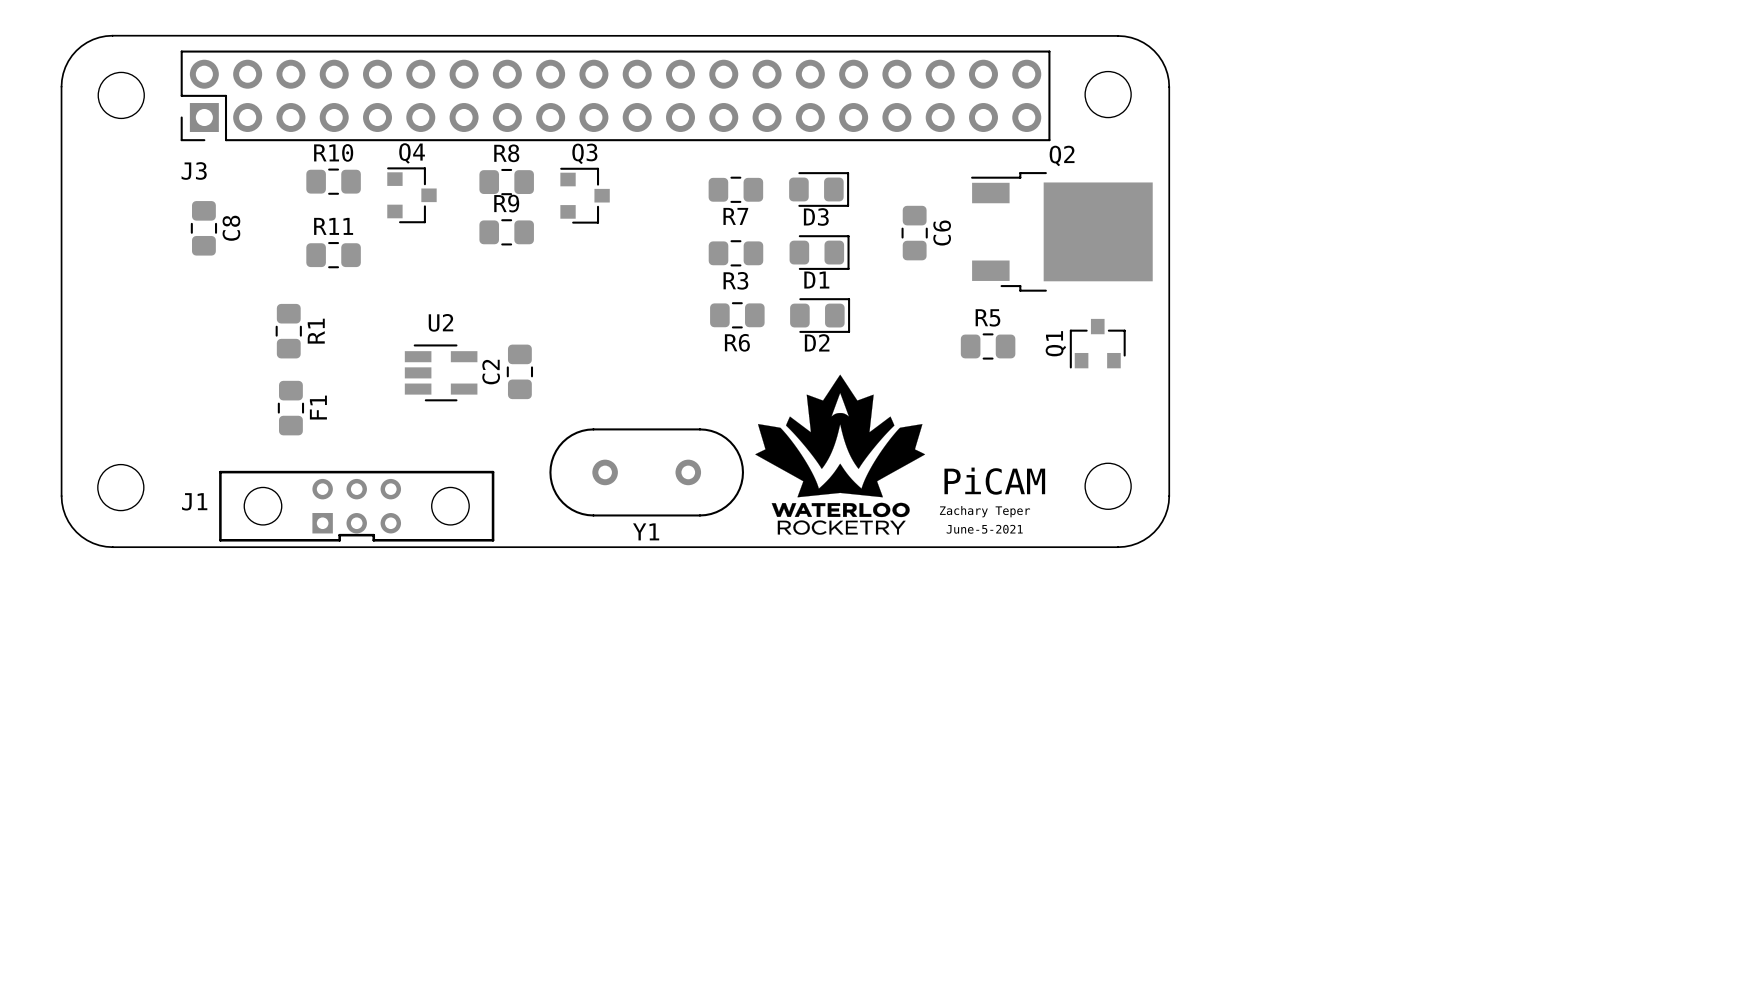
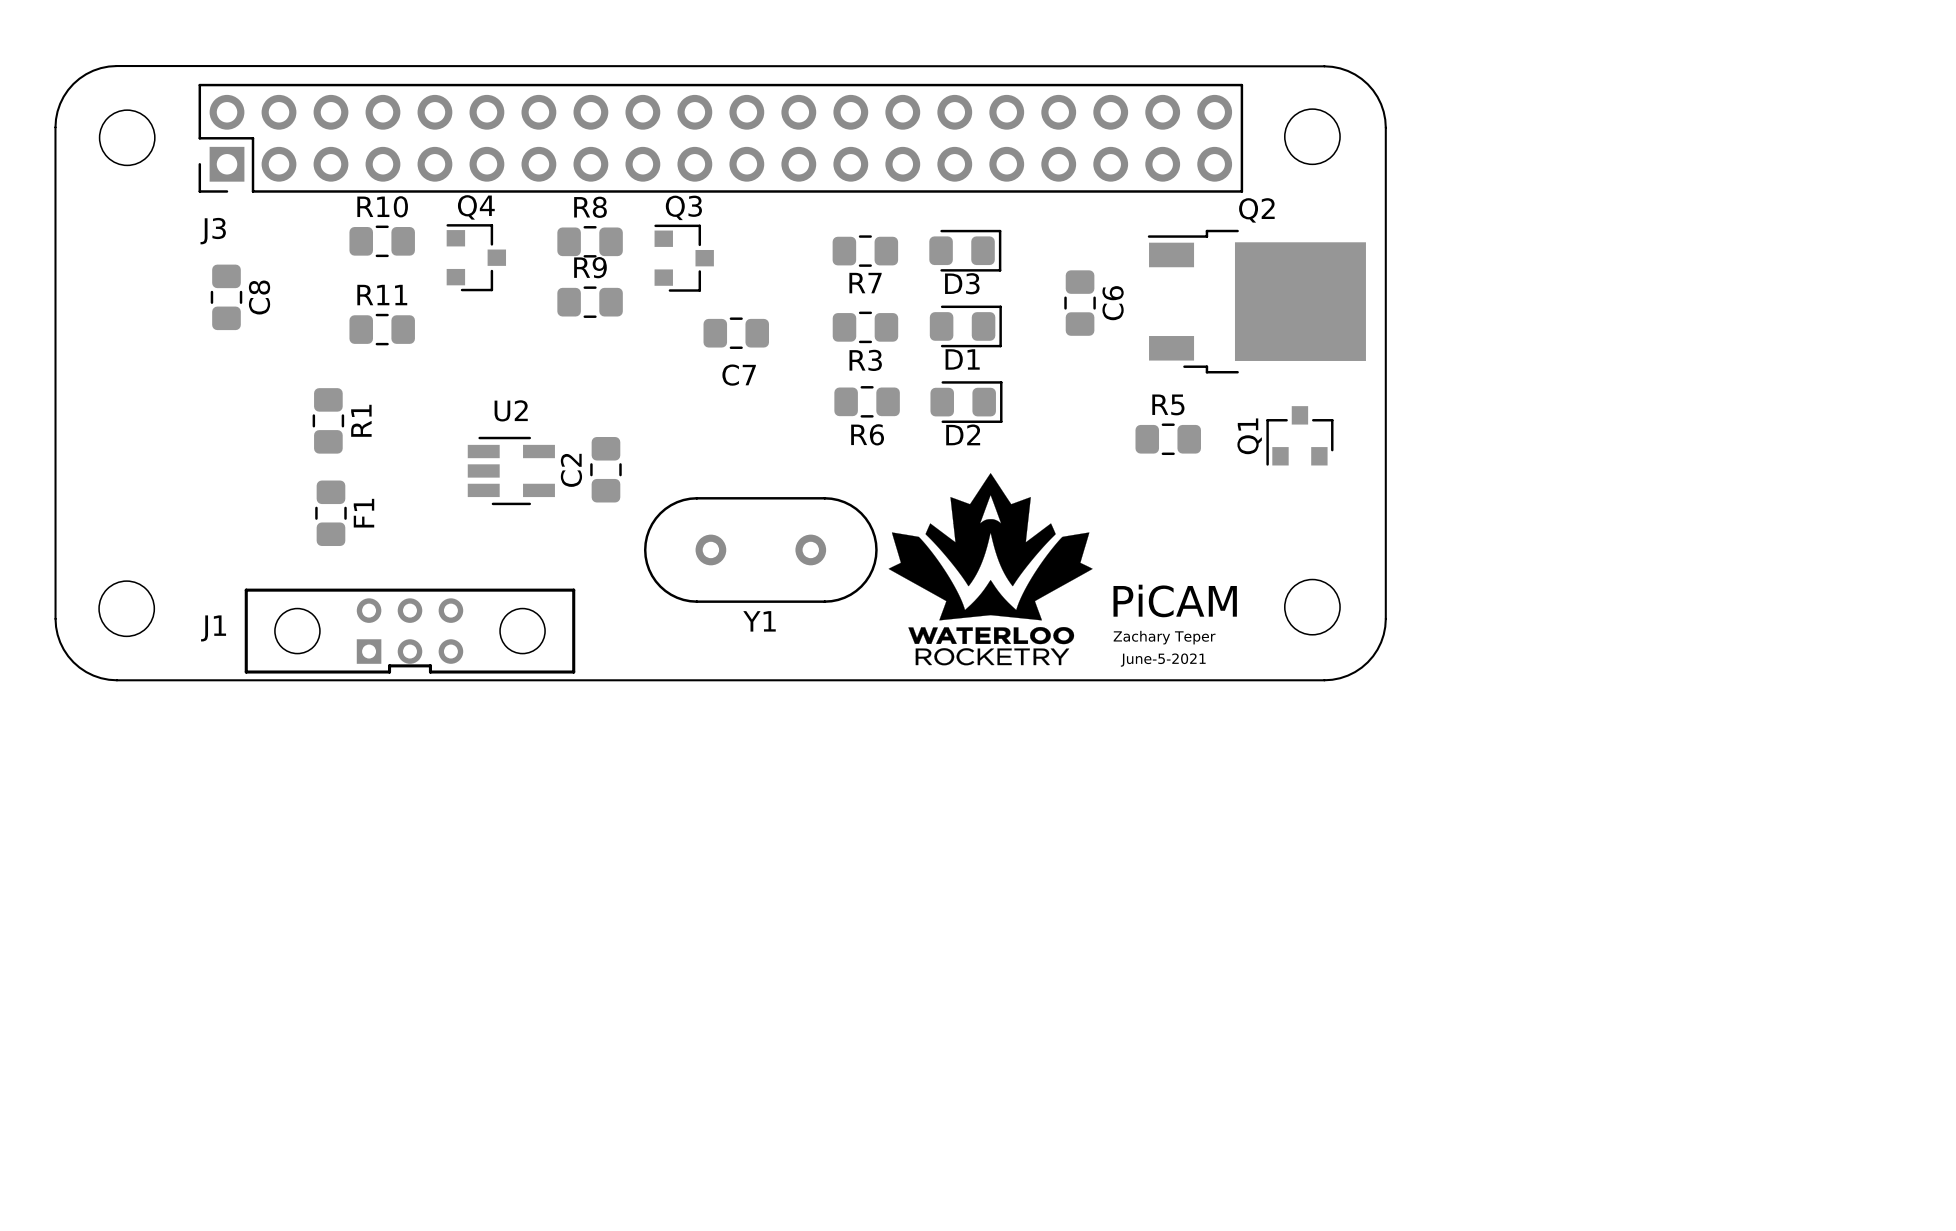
C7: none -> (736, 333)
Y1 position: (646, 472) -> (760, 549)

